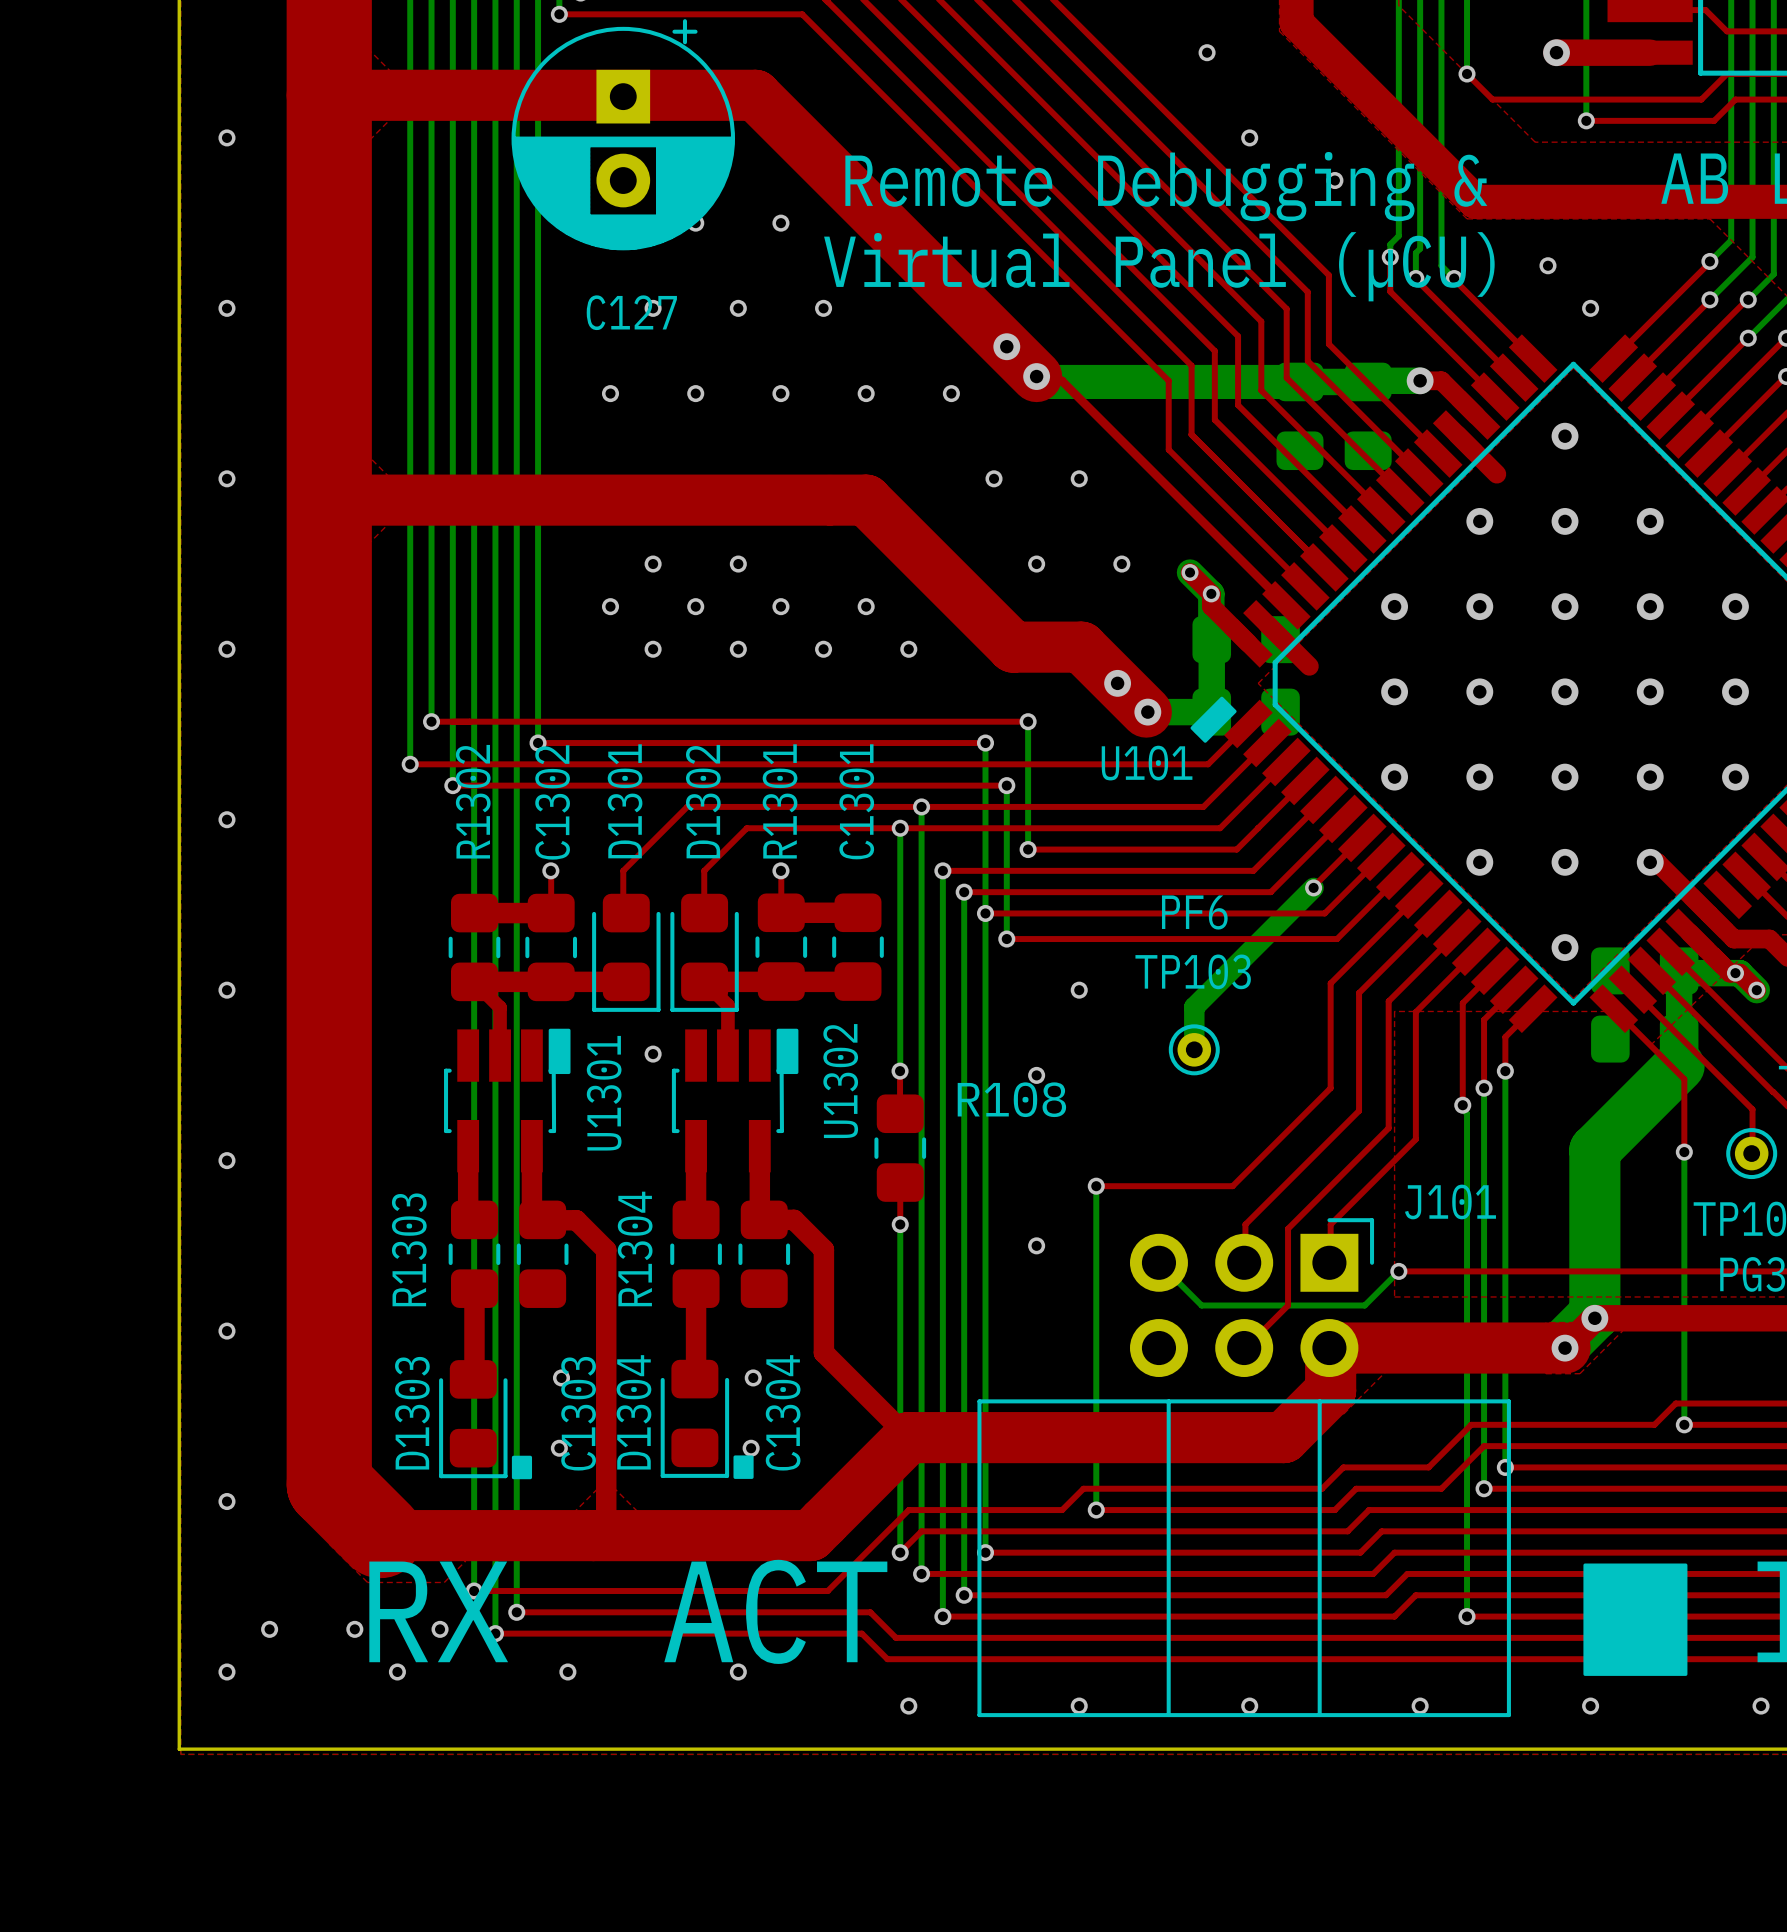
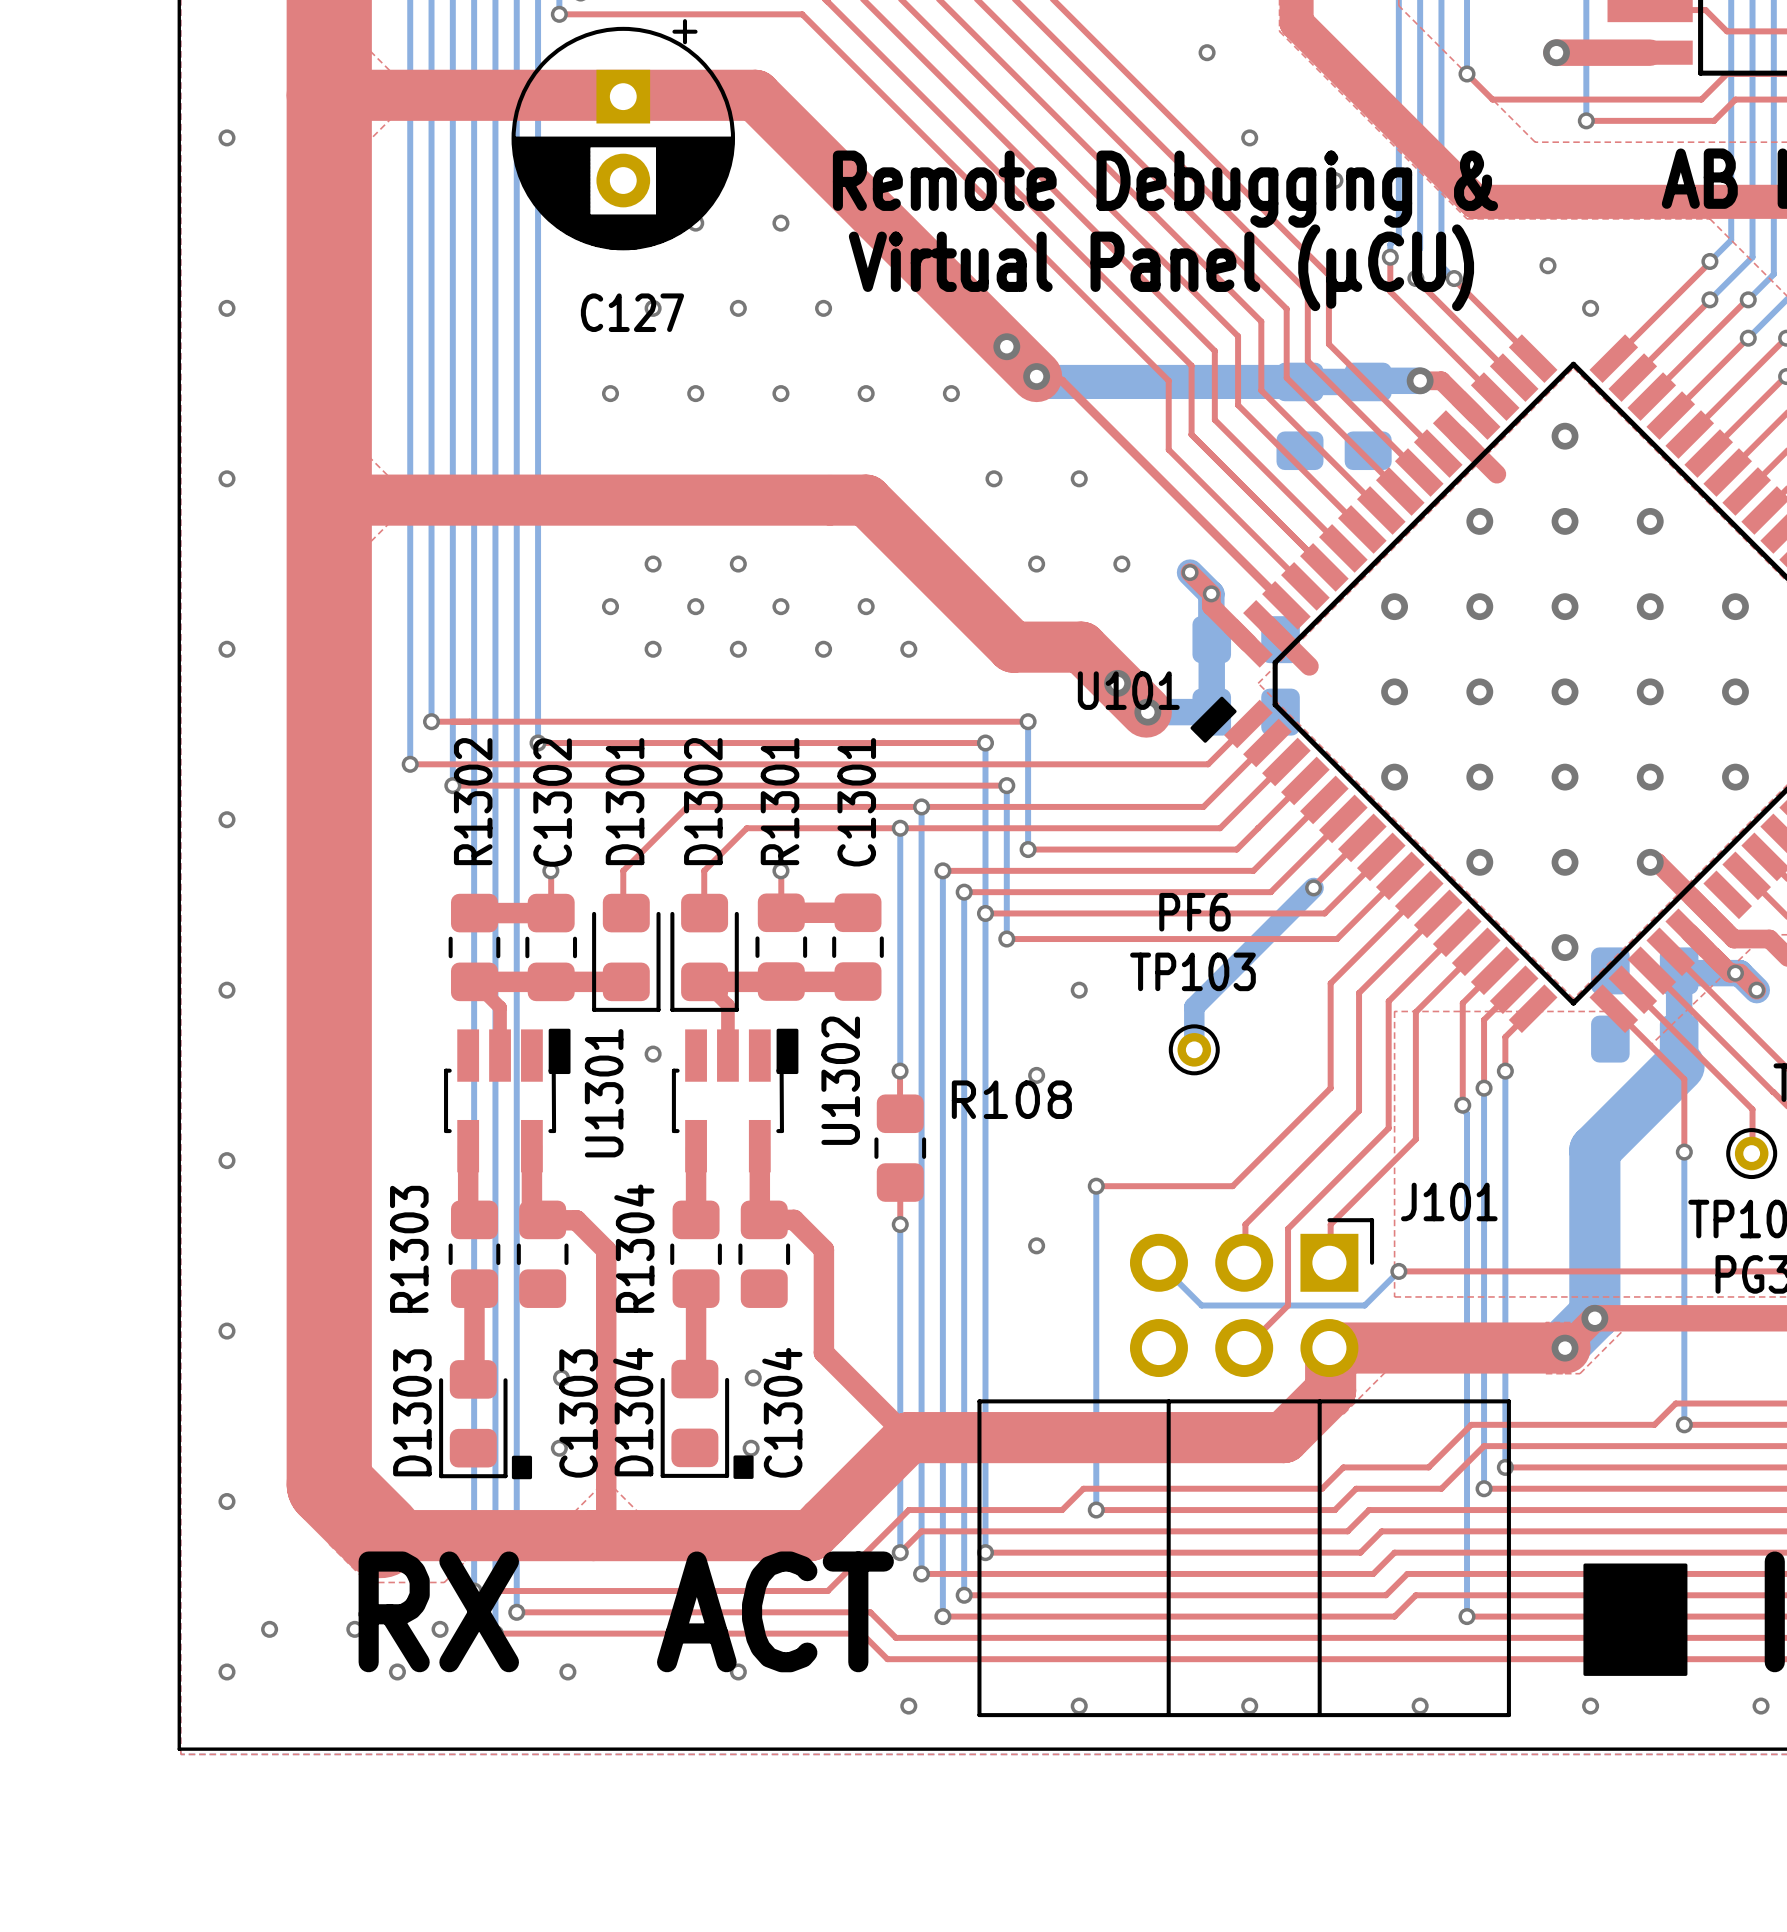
U101 name position: U101 (1147, 763) -> U101 (1128, 690)

